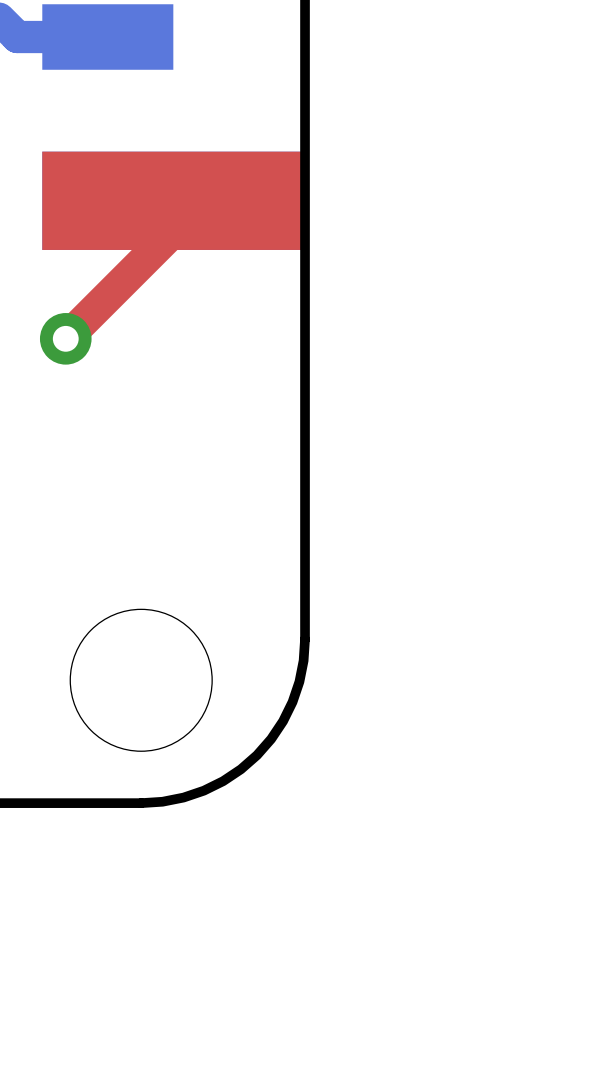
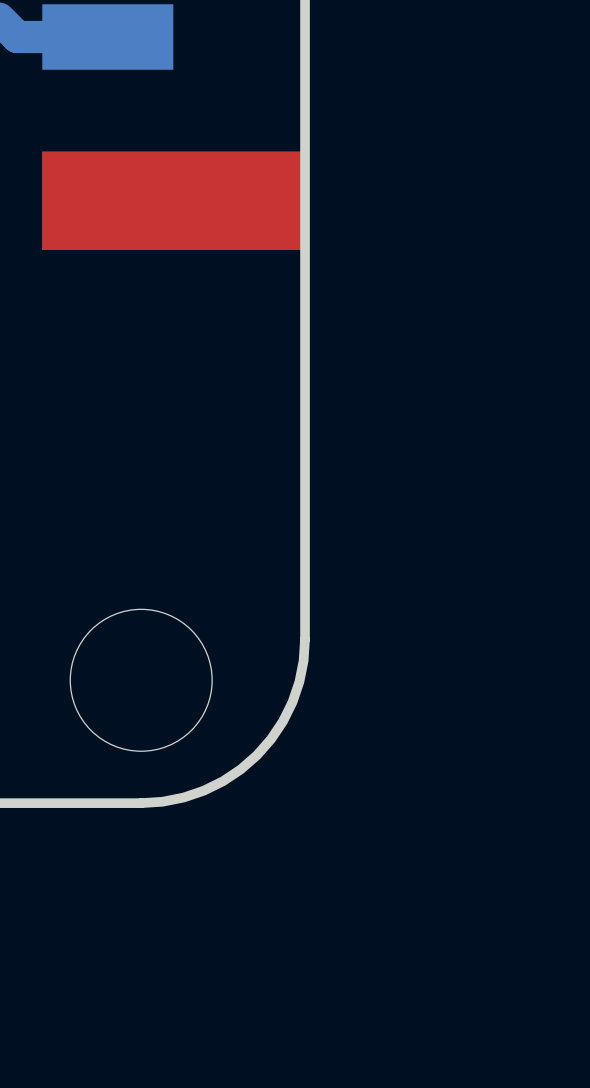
top track: (173, 200) (173, 231) (65, 338) -> none
via: (65, 338) -> none

